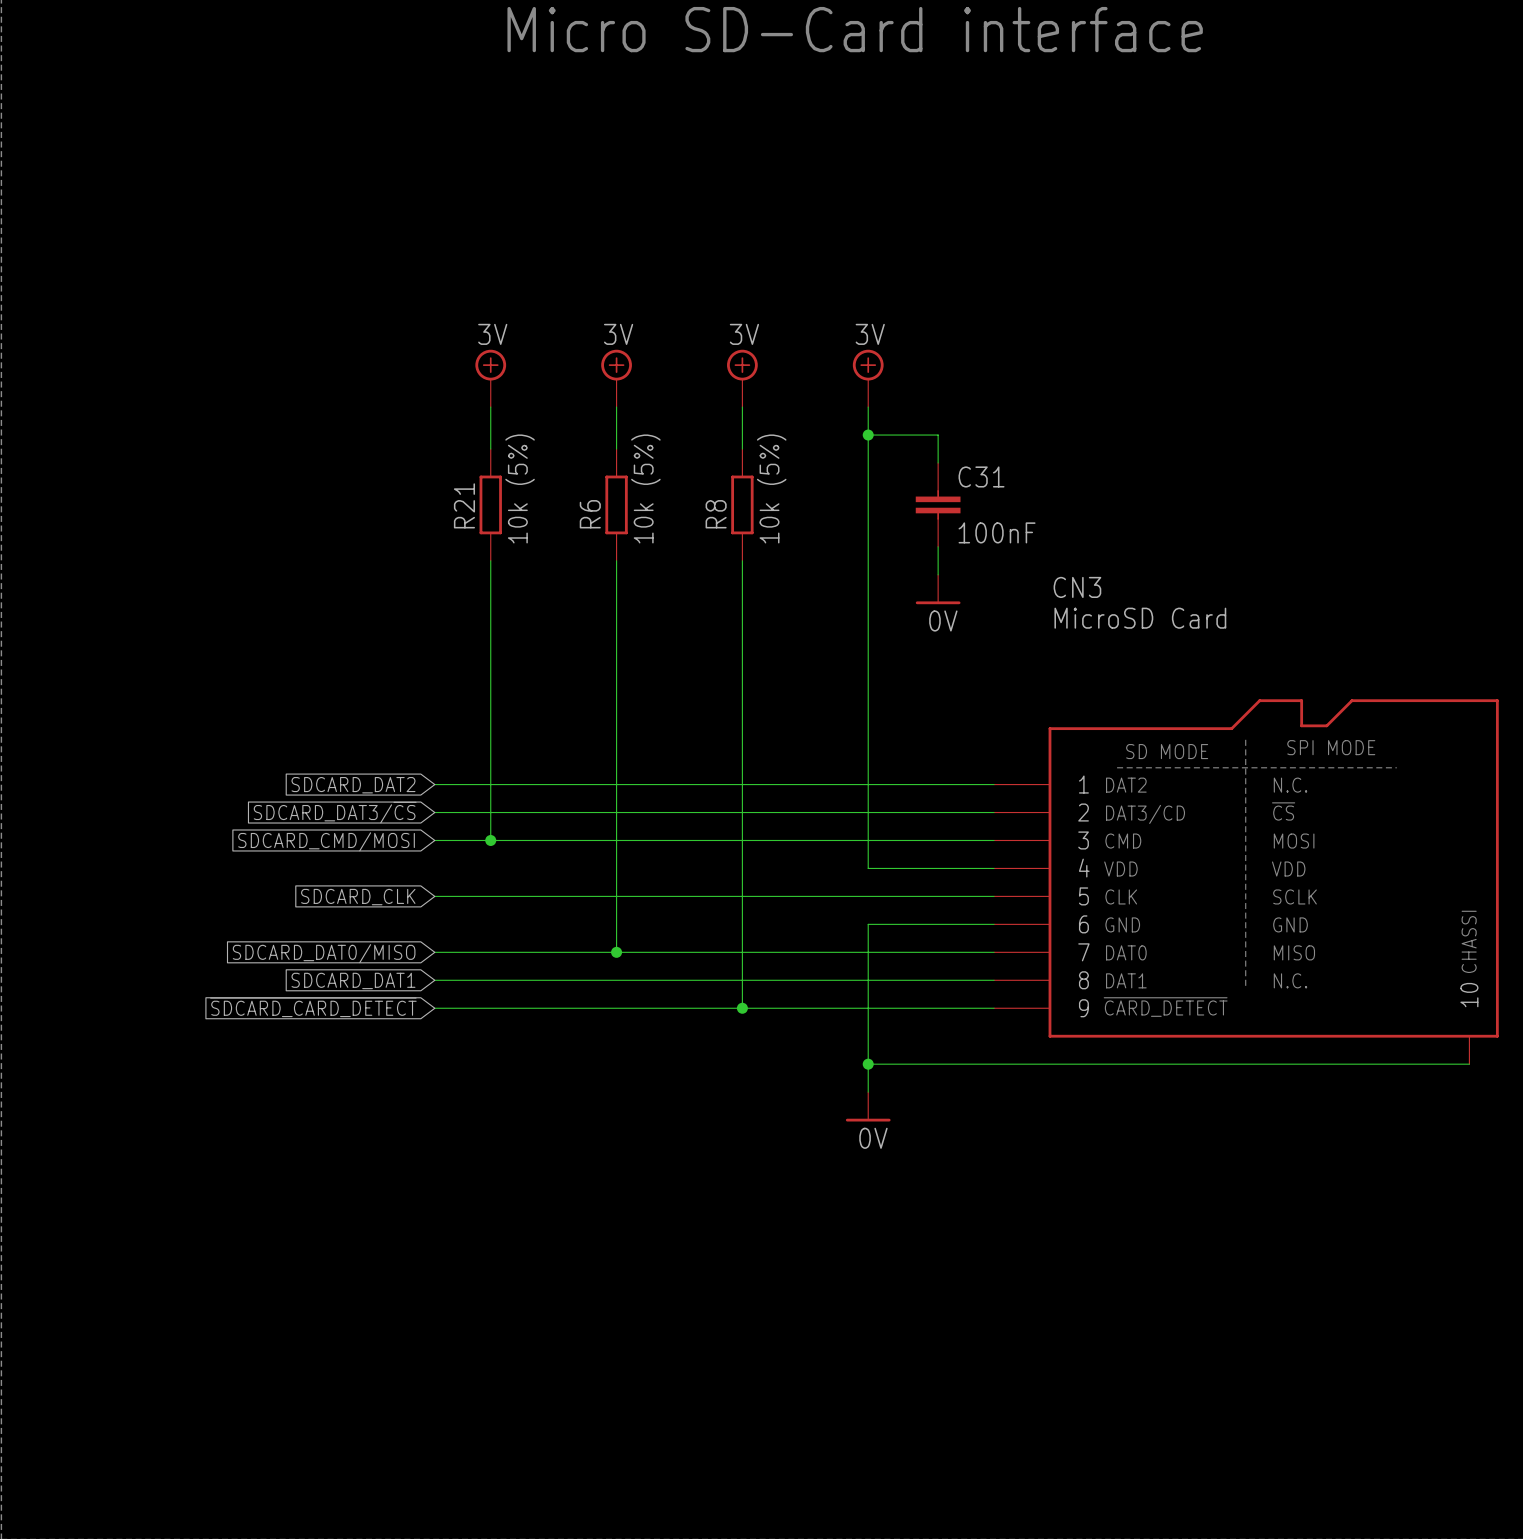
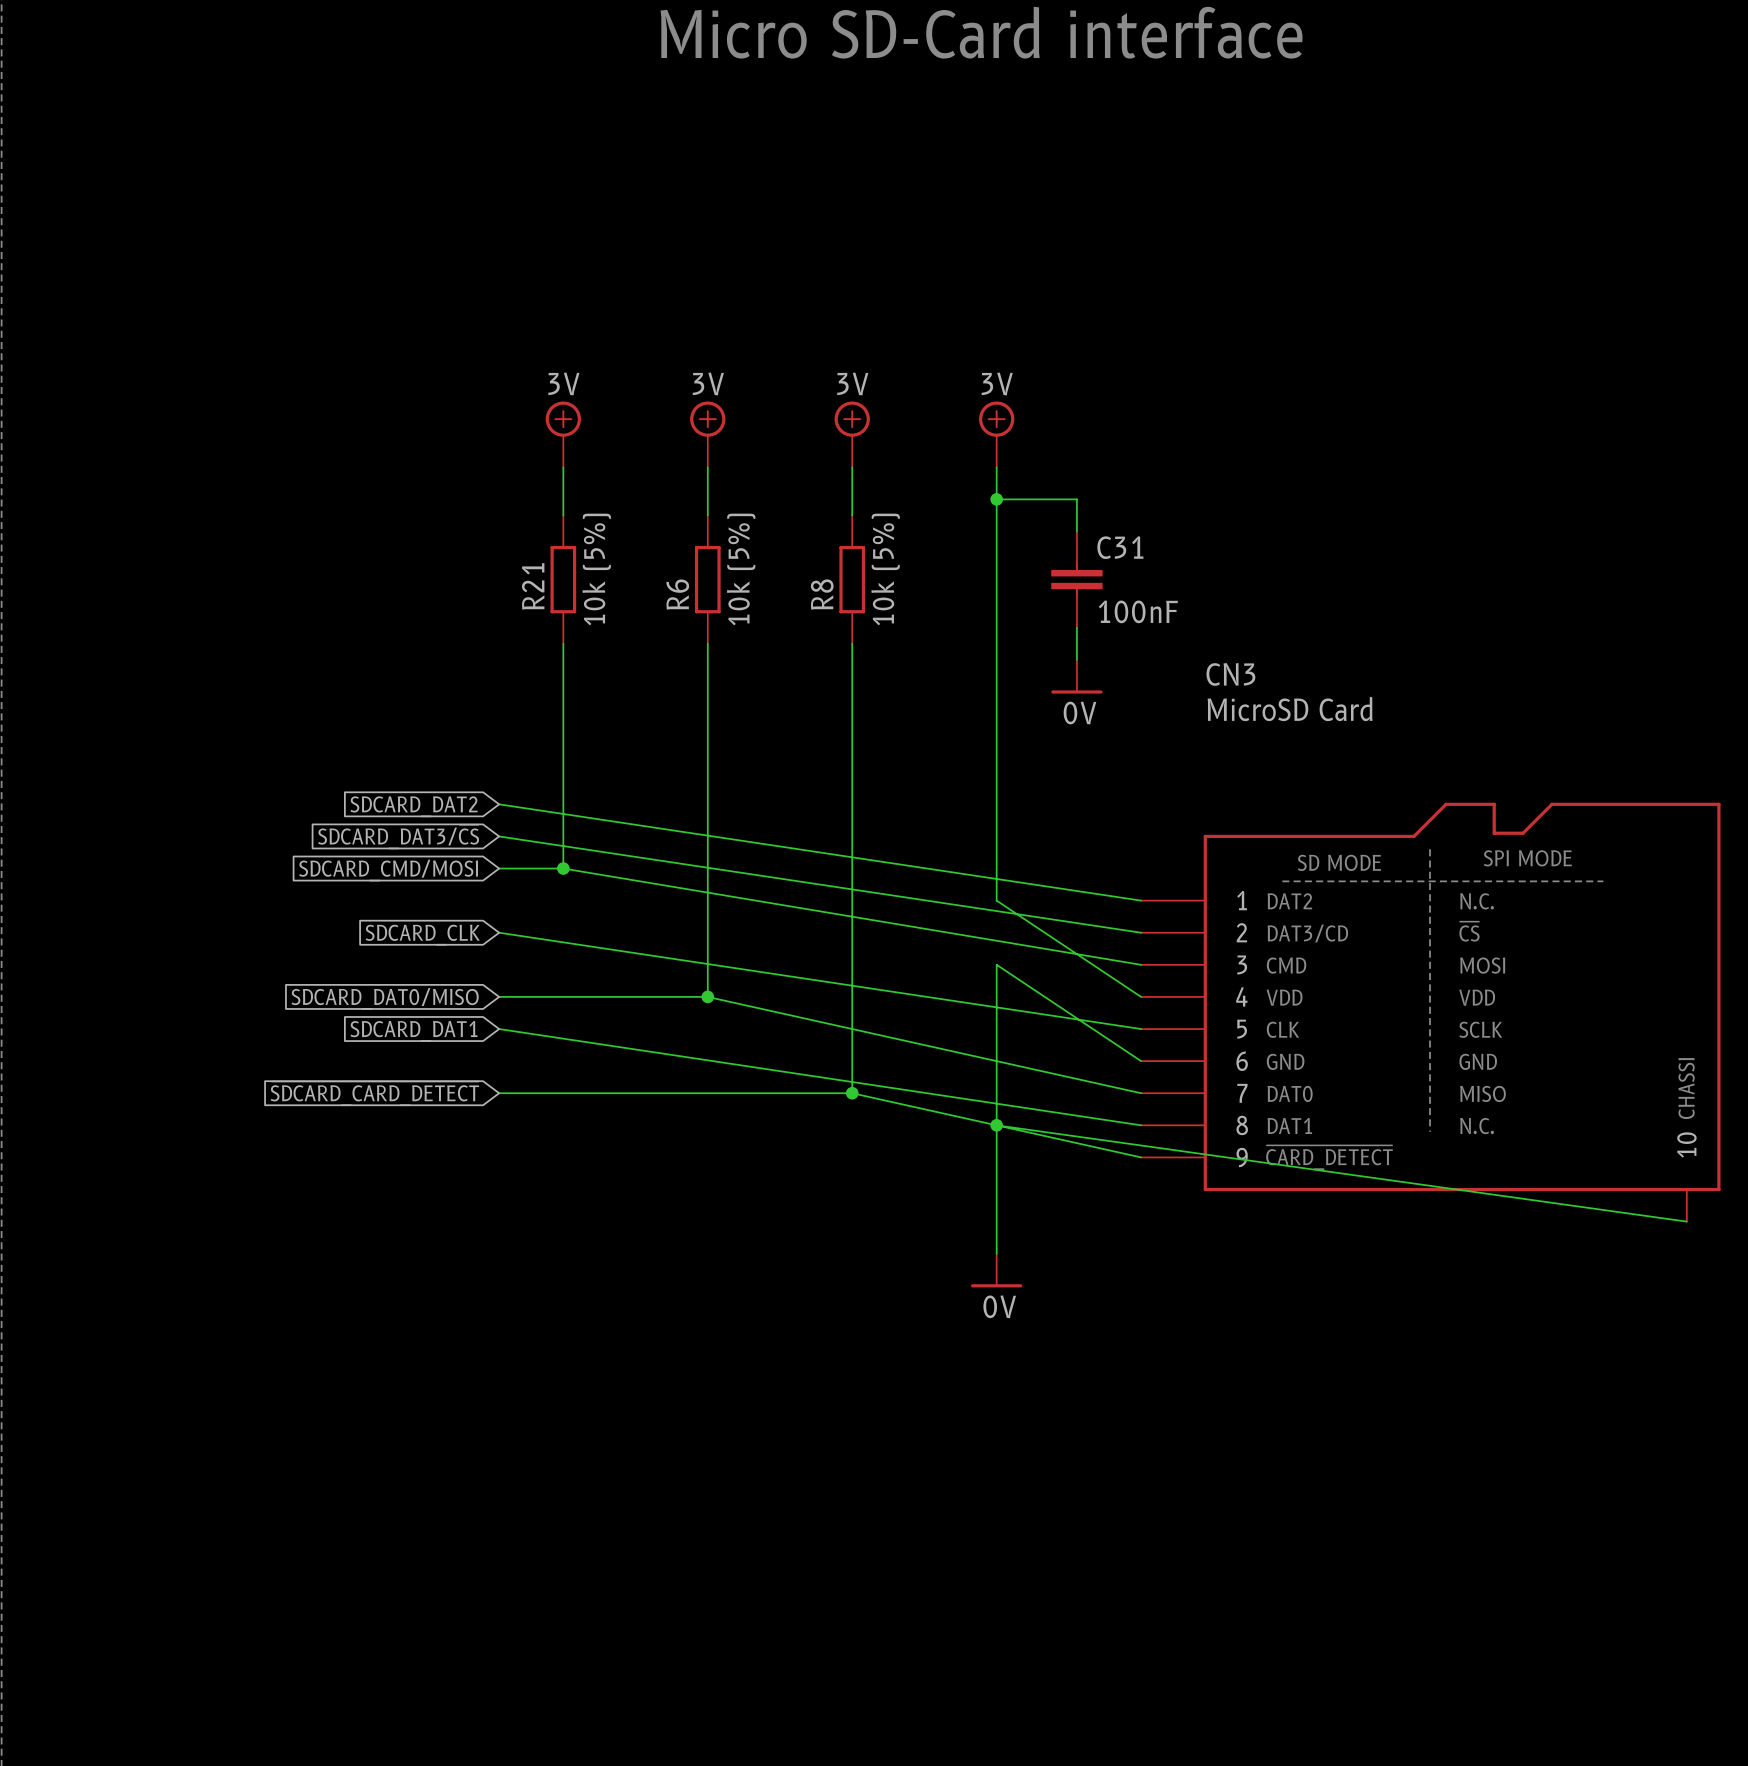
global label: none -> SDCARD_DAT3/~{CS} (398, 836)
wire: (490, 756) (490, 840) -> none
junction: none -> (563, 868)
wire: (434, 784) (994, 784) -> (499, 804) (1141, 900)
wire: (868, 784) (868, 840) -> (996, 996) (996, 1061)
global label position: SDCARD_DAT2 (353, 785) -> SDCARD_DAT2 (414, 806)
global label: SDCARD_DAT3/~{CS} (335, 812) -> SDCARD_CLK (422, 935)
wire: (434, 812) (994, 812) -> (499, 836) (1141, 932)
wire: (434, 840) (994, 840) -> (499, 868) (563, 868) (1141, 964)
junction: (490, 840) -> none
global label position: SDCARD_CMD/MOSI (326, 841) -> SDCARD_CMD/MOSI (388, 870)
wire: (616, 868) (616, 952) -> none
junction: none -> (707, 996)
wire: (868, 868) (994, 868) -> (996, 900) (1141, 996)
global label: none -> SDCARD_DAT0/MISO (385, 998)
wire: (434, 896) (994, 896) -> (499, 932) (1141, 1029)
global label: SDCARD_CLK (358, 897) -> SDCARD_DAT1 (413, 1031)
wire: (868, 924) (994, 924) -> (996, 964) (1141, 1061)
junction: (616, 952) -> none
wire: (994, 952) (742, 952) (742, 1008) -> (1141, 1093) (707, 996) (499, 996)
global label: SDCARD_DAT0/MISO (324, 953) -> ~{SDCARD_CARD_DETECT} (374, 1093)
global label: SDCARD_DAT1 (353, 980) -> none
wire: (434, 980) (994, 980) -> (499, 1029) (1141, 1125)
junction: none -> (996, 1125)
global label: ~{SDCARD_CARD_DETECT} (313, 1007) -> none
wire: (434, 1008) (994, 1008) -> (852, 1093) (1141, 1157)
junction position: (742, 1008) -> (852, 1093)
wire: (868, 1064) (1469, 1064) -> (996, 1125) (1686, 1221)
junction: (868, 1064) -> none

